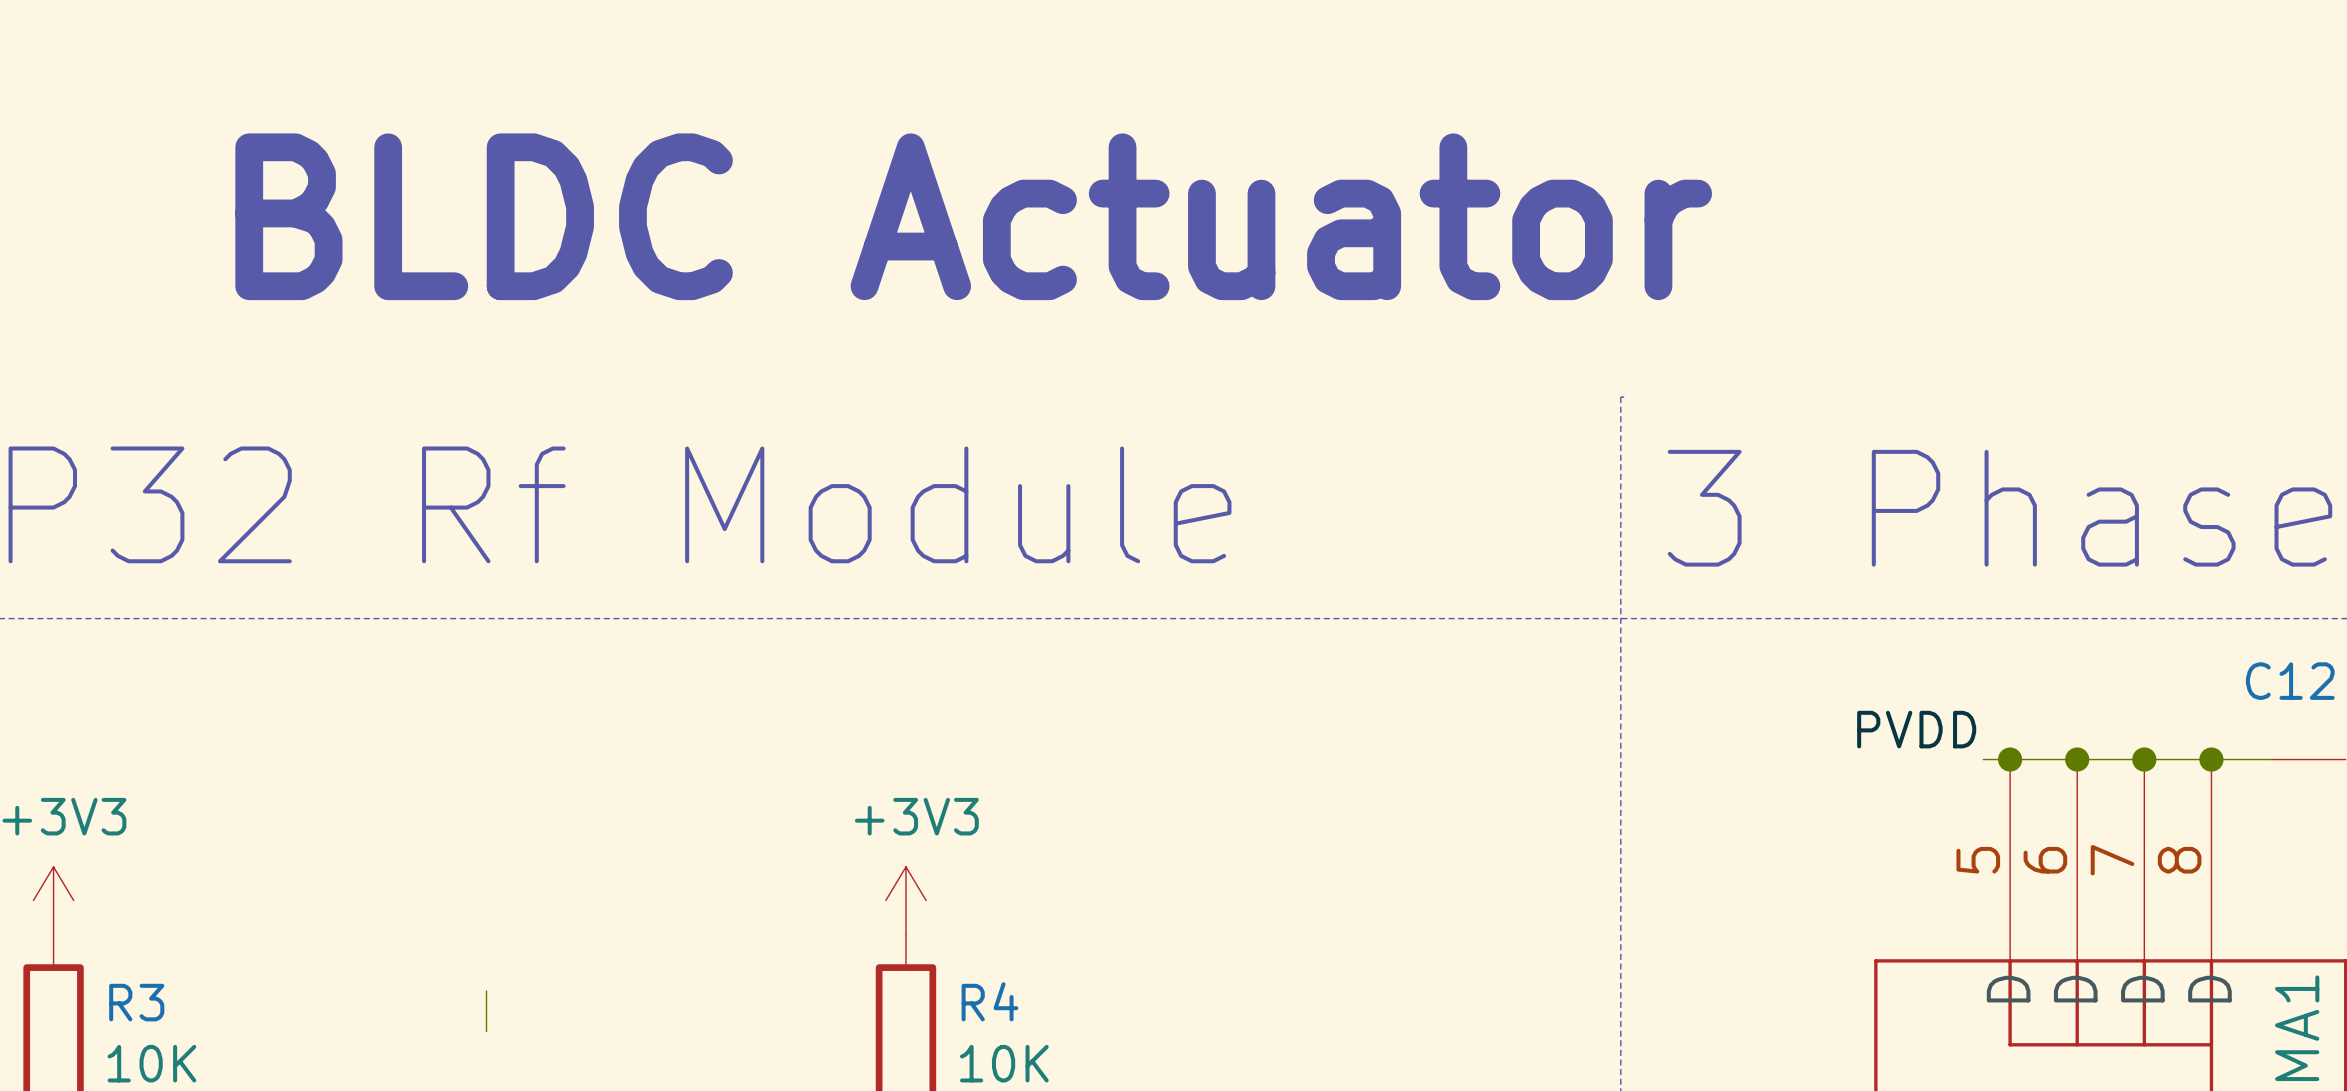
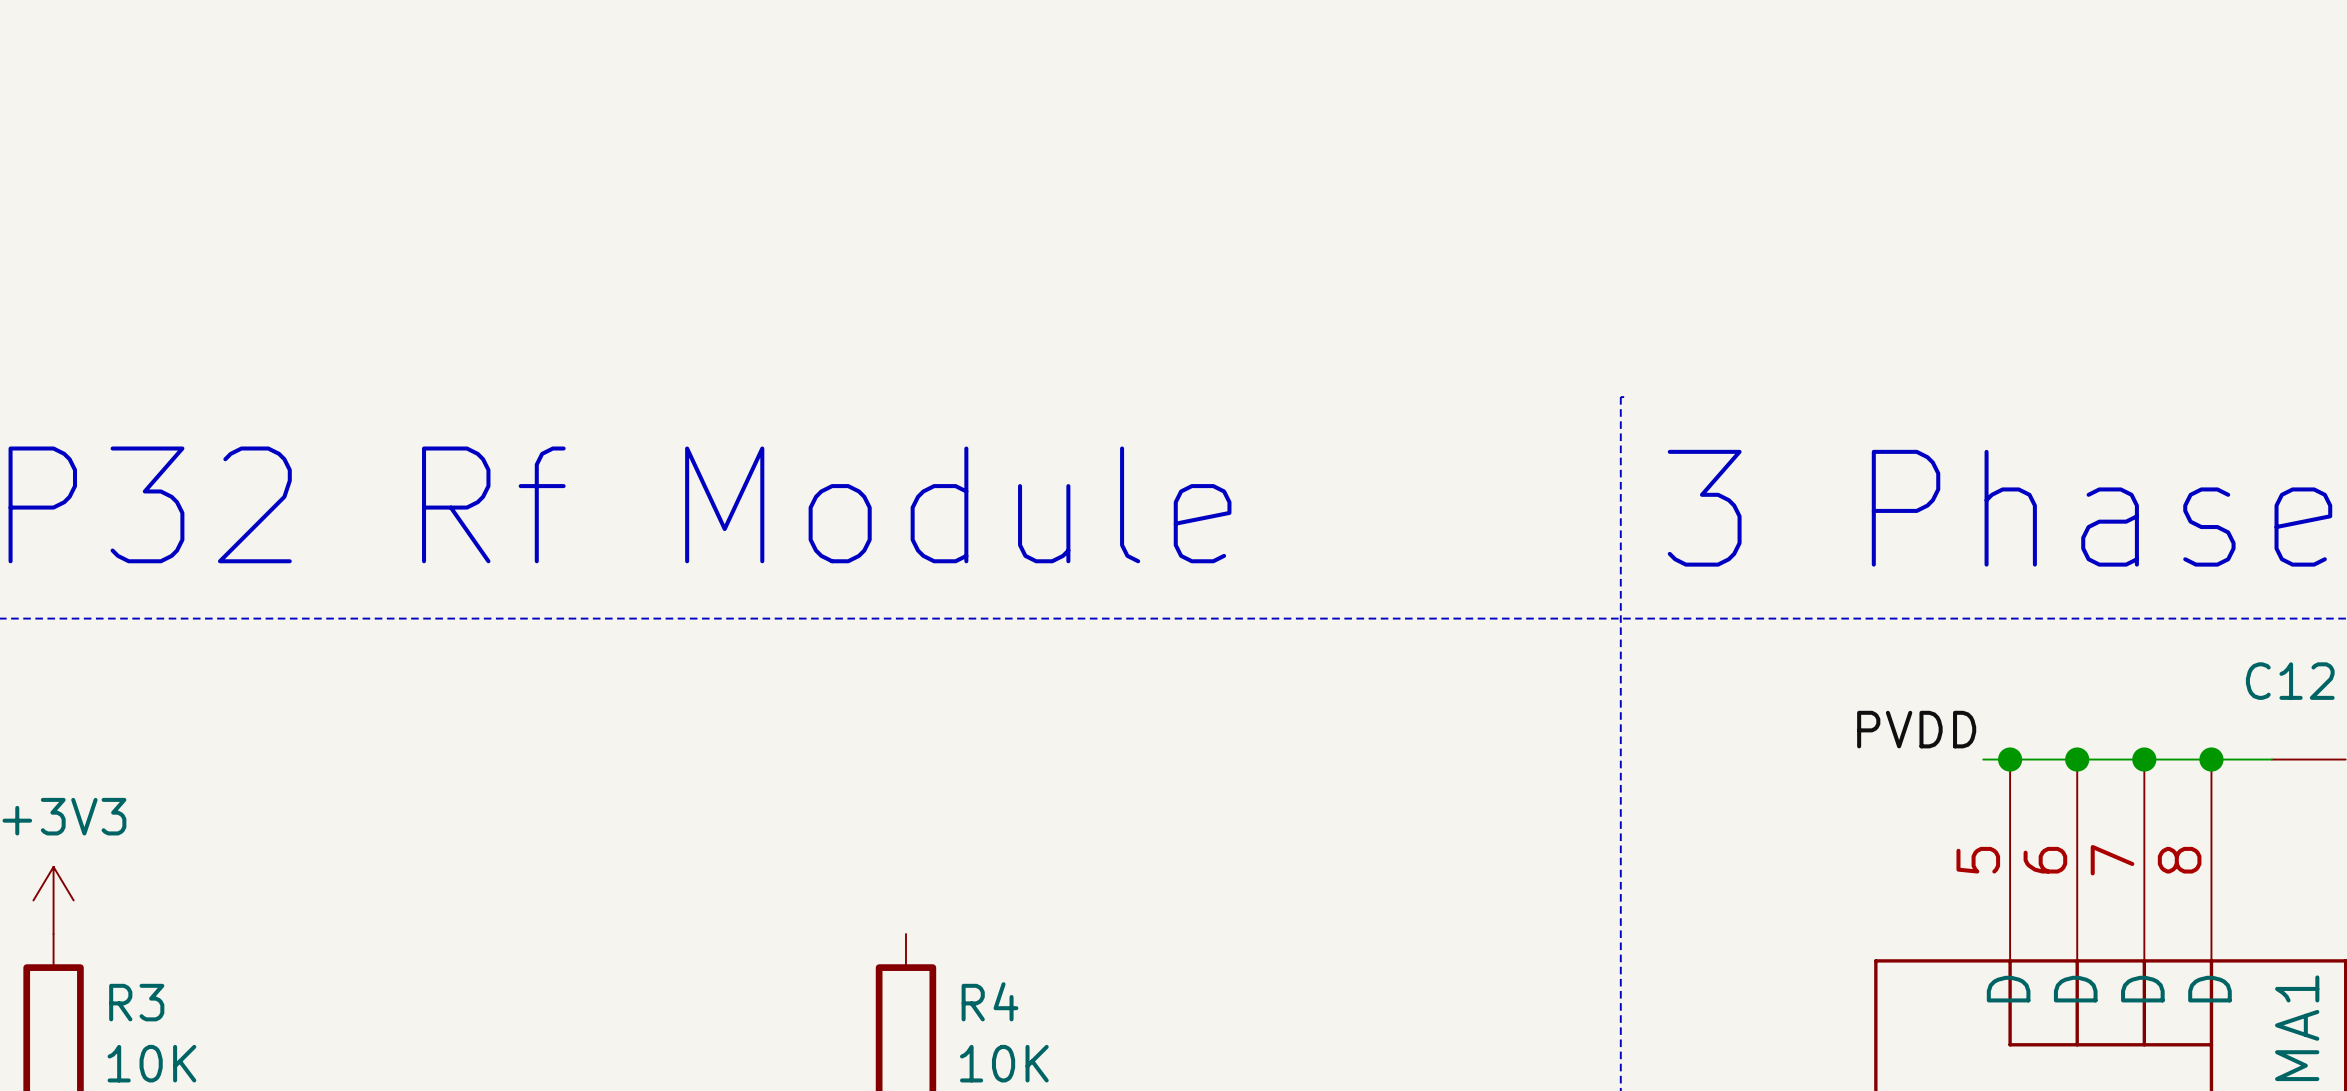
text: BLDC Actuator (973, 216) -> none
power symbol: +3V3 (905, 900) -> none
wire: (486, 991) (486, 1031) -> none

